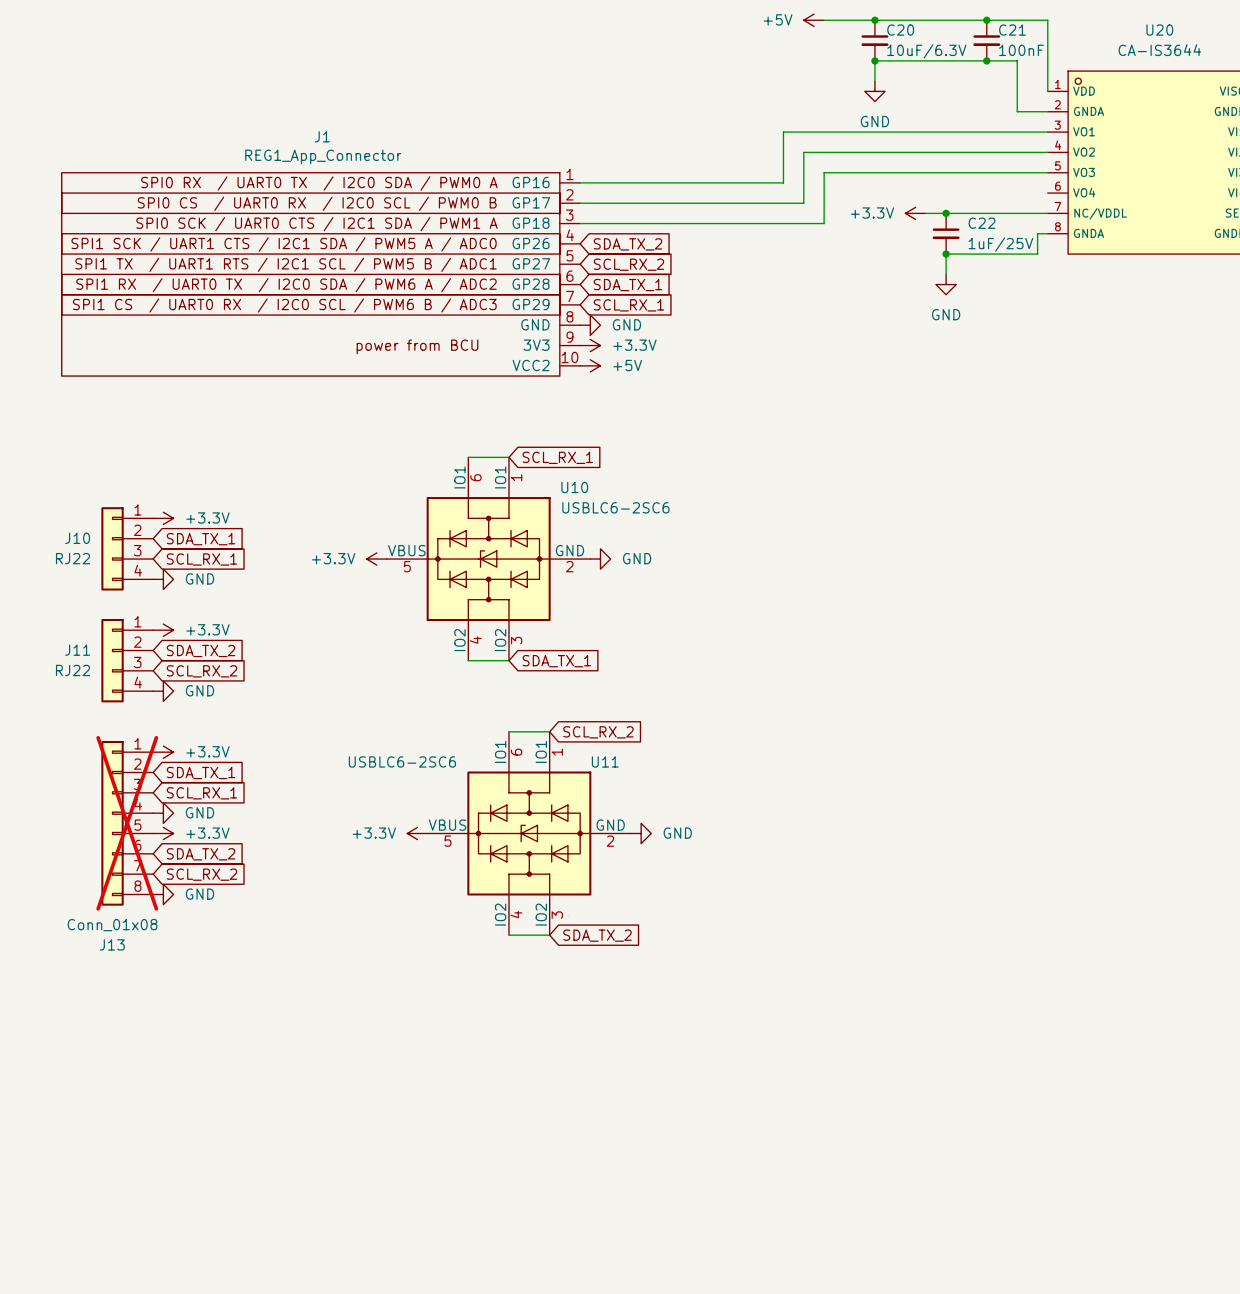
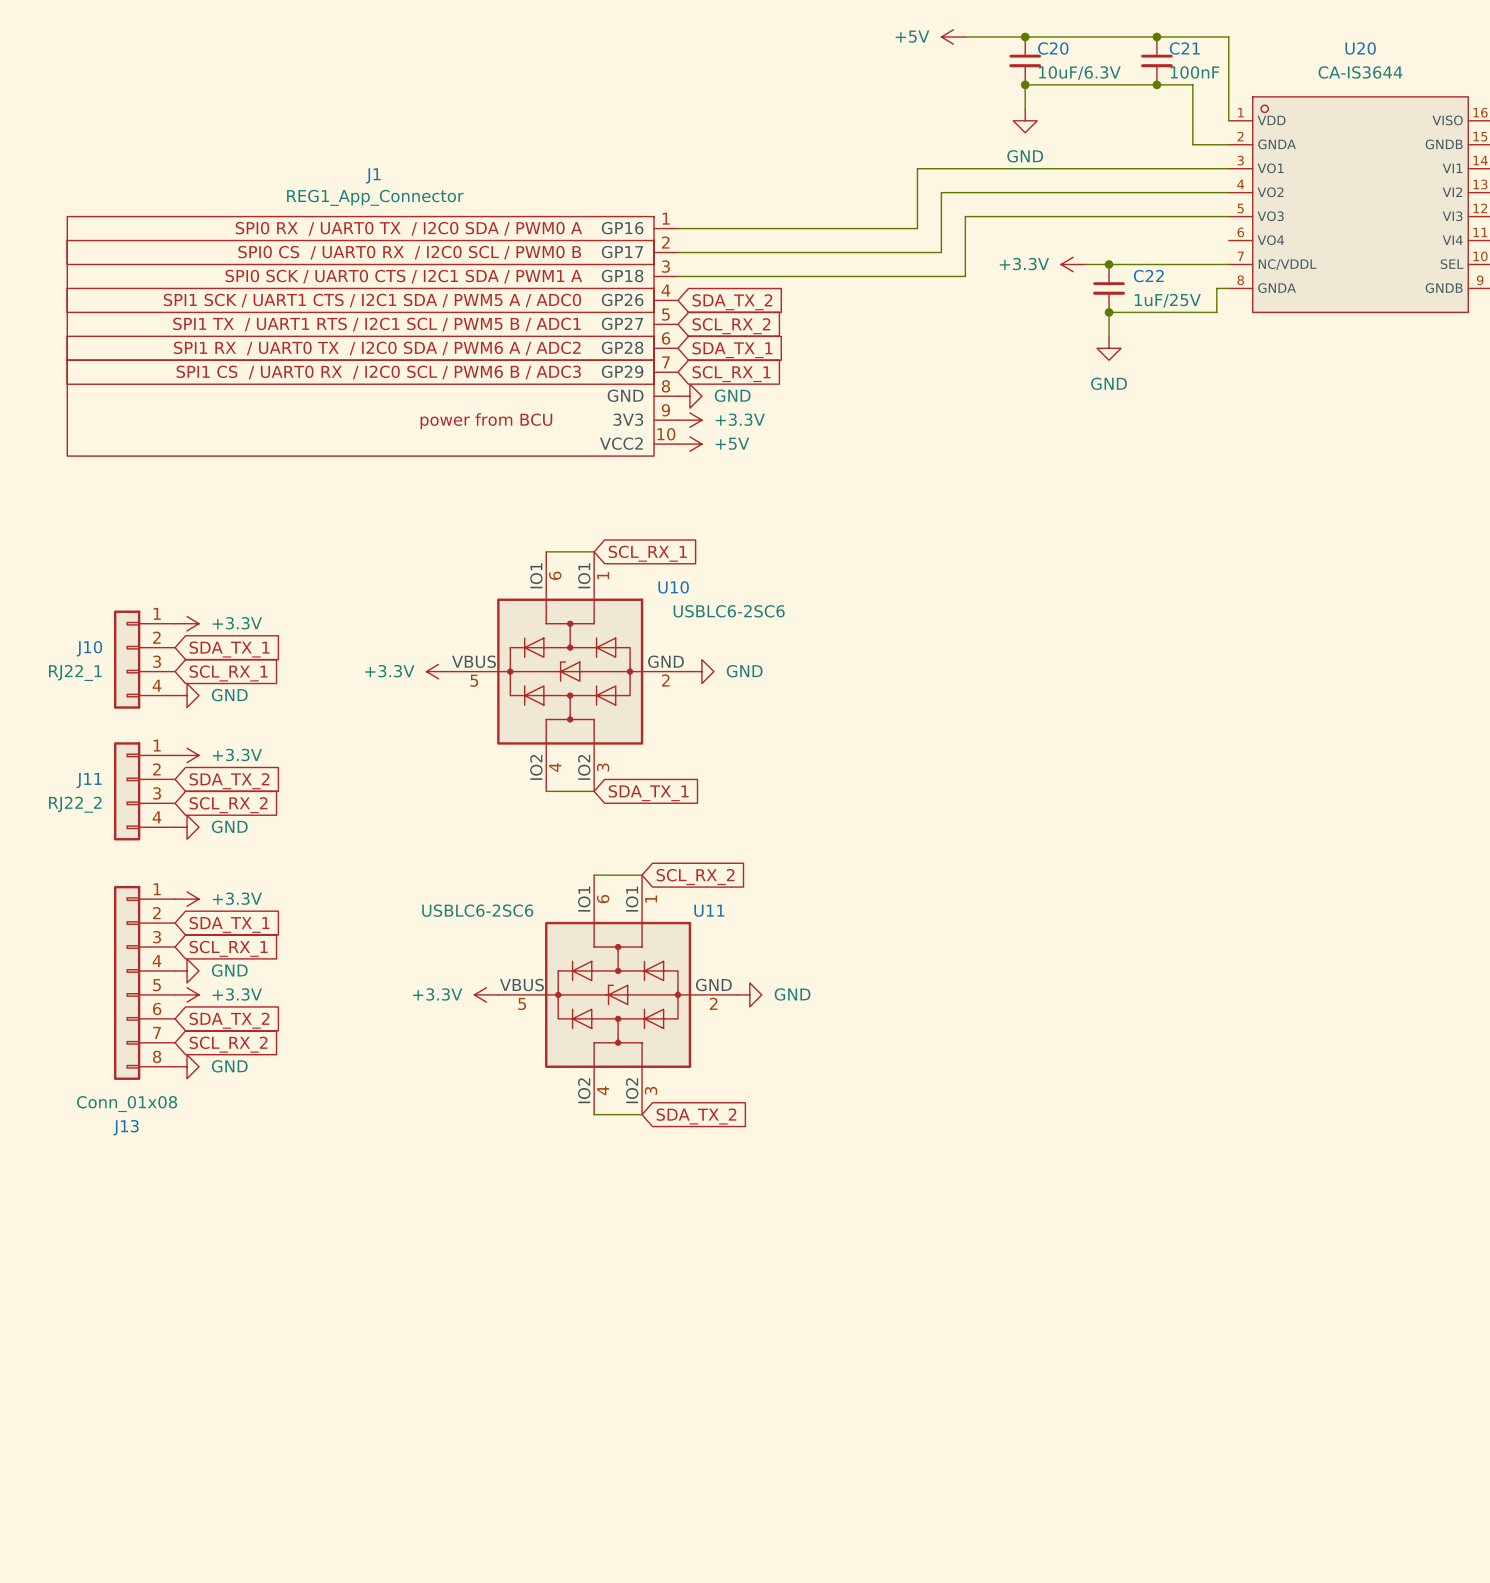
J10 value: RJ22 (73, 558) -> RJ22_1 (75, 672)
J11 value: RJ22 (73, 670) -> RJ22_2 (75, 804)
J13 do-not-place cross: (127, 823) -> none

